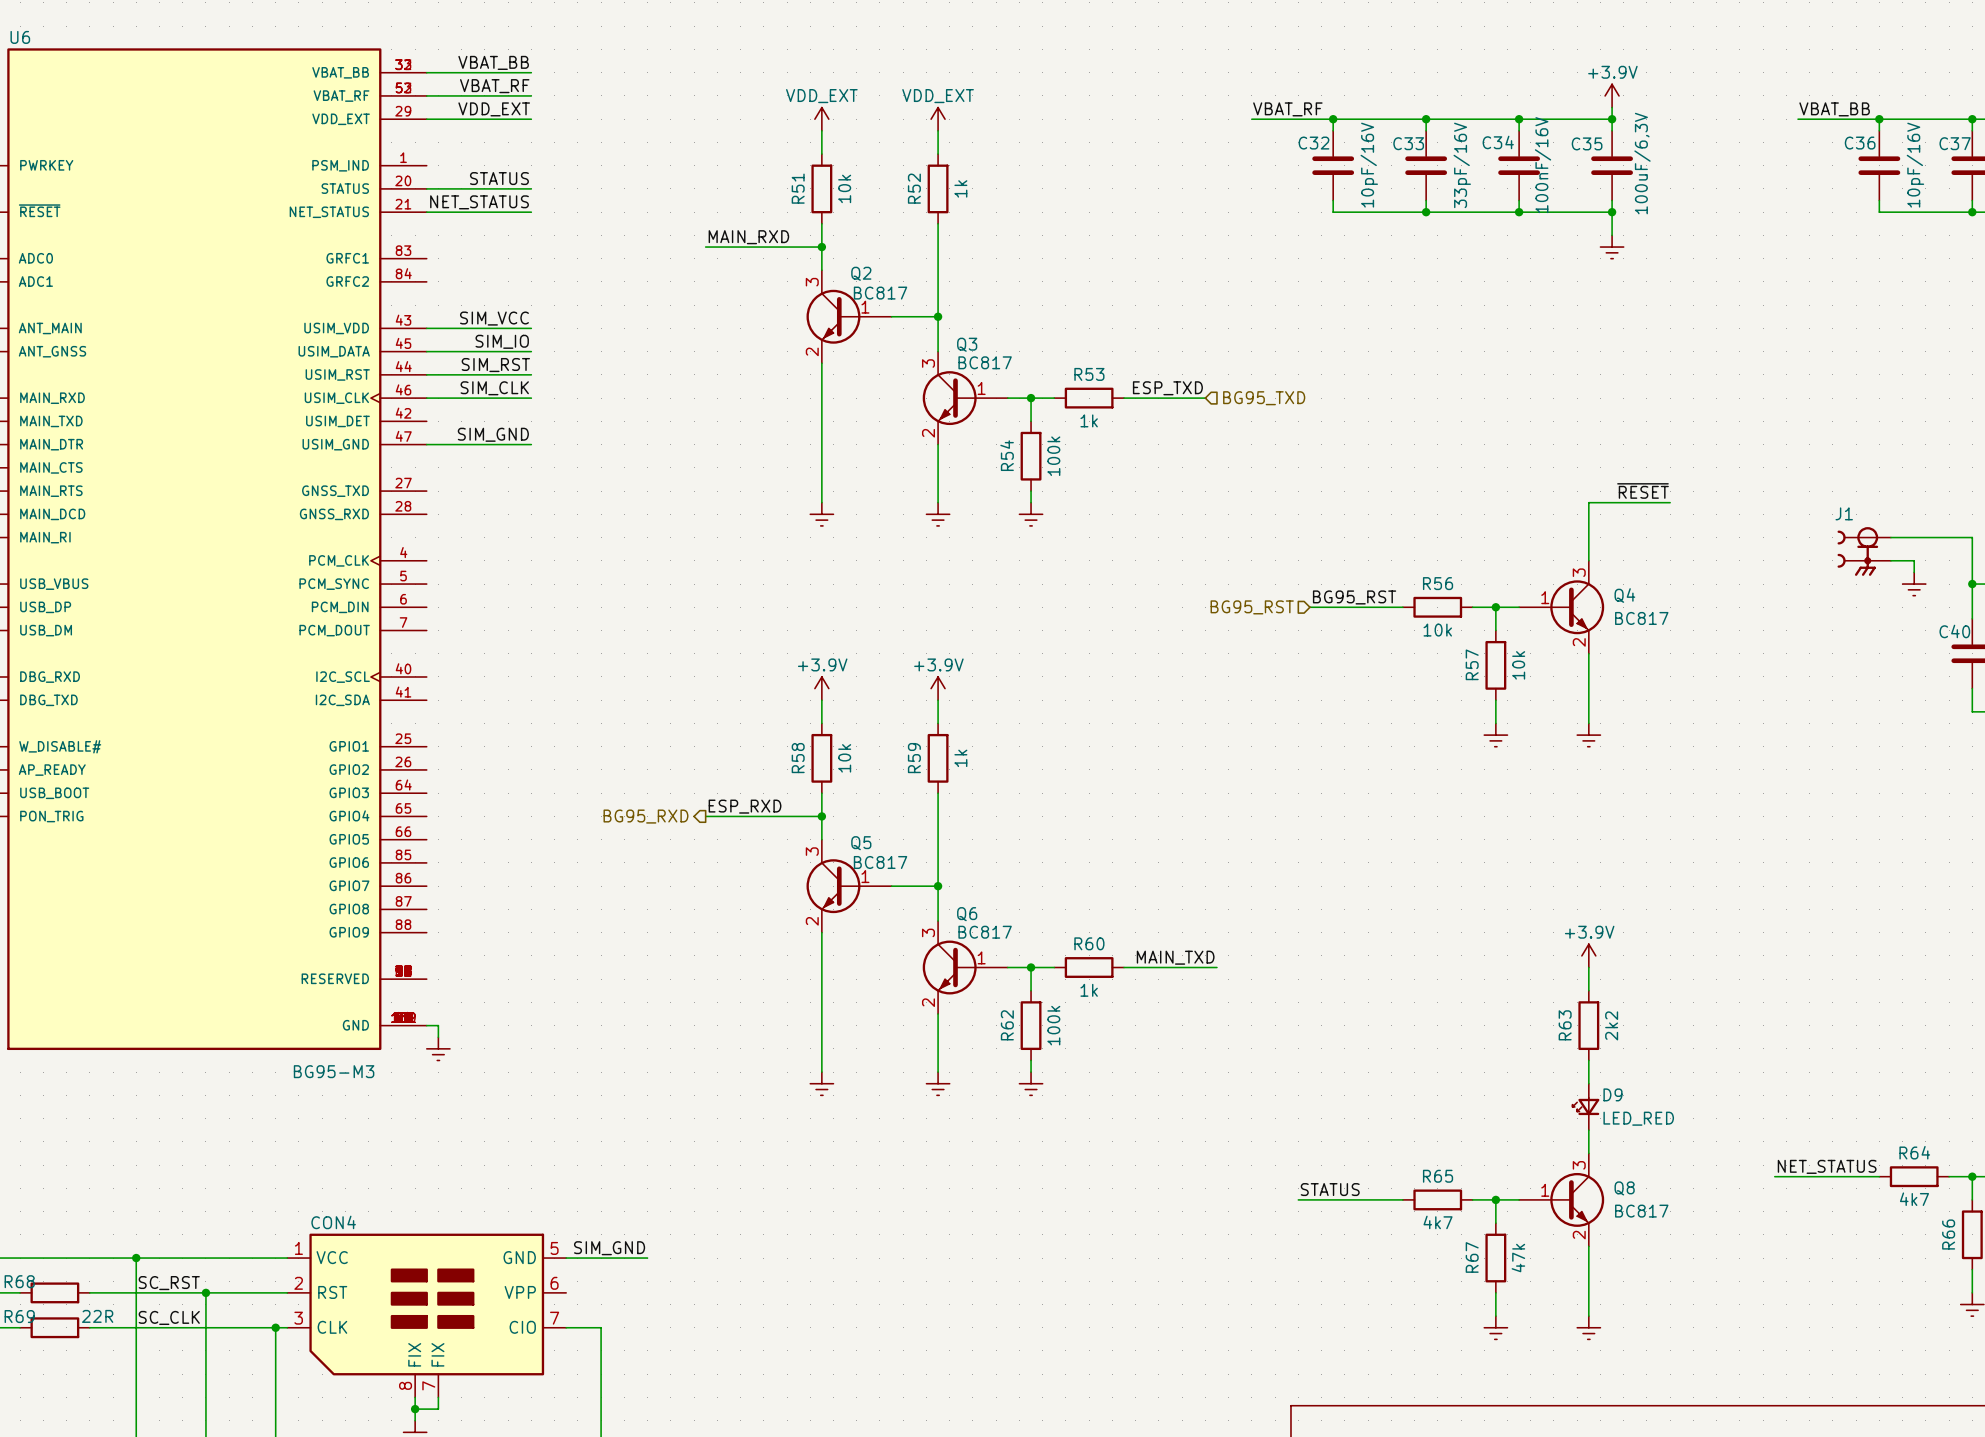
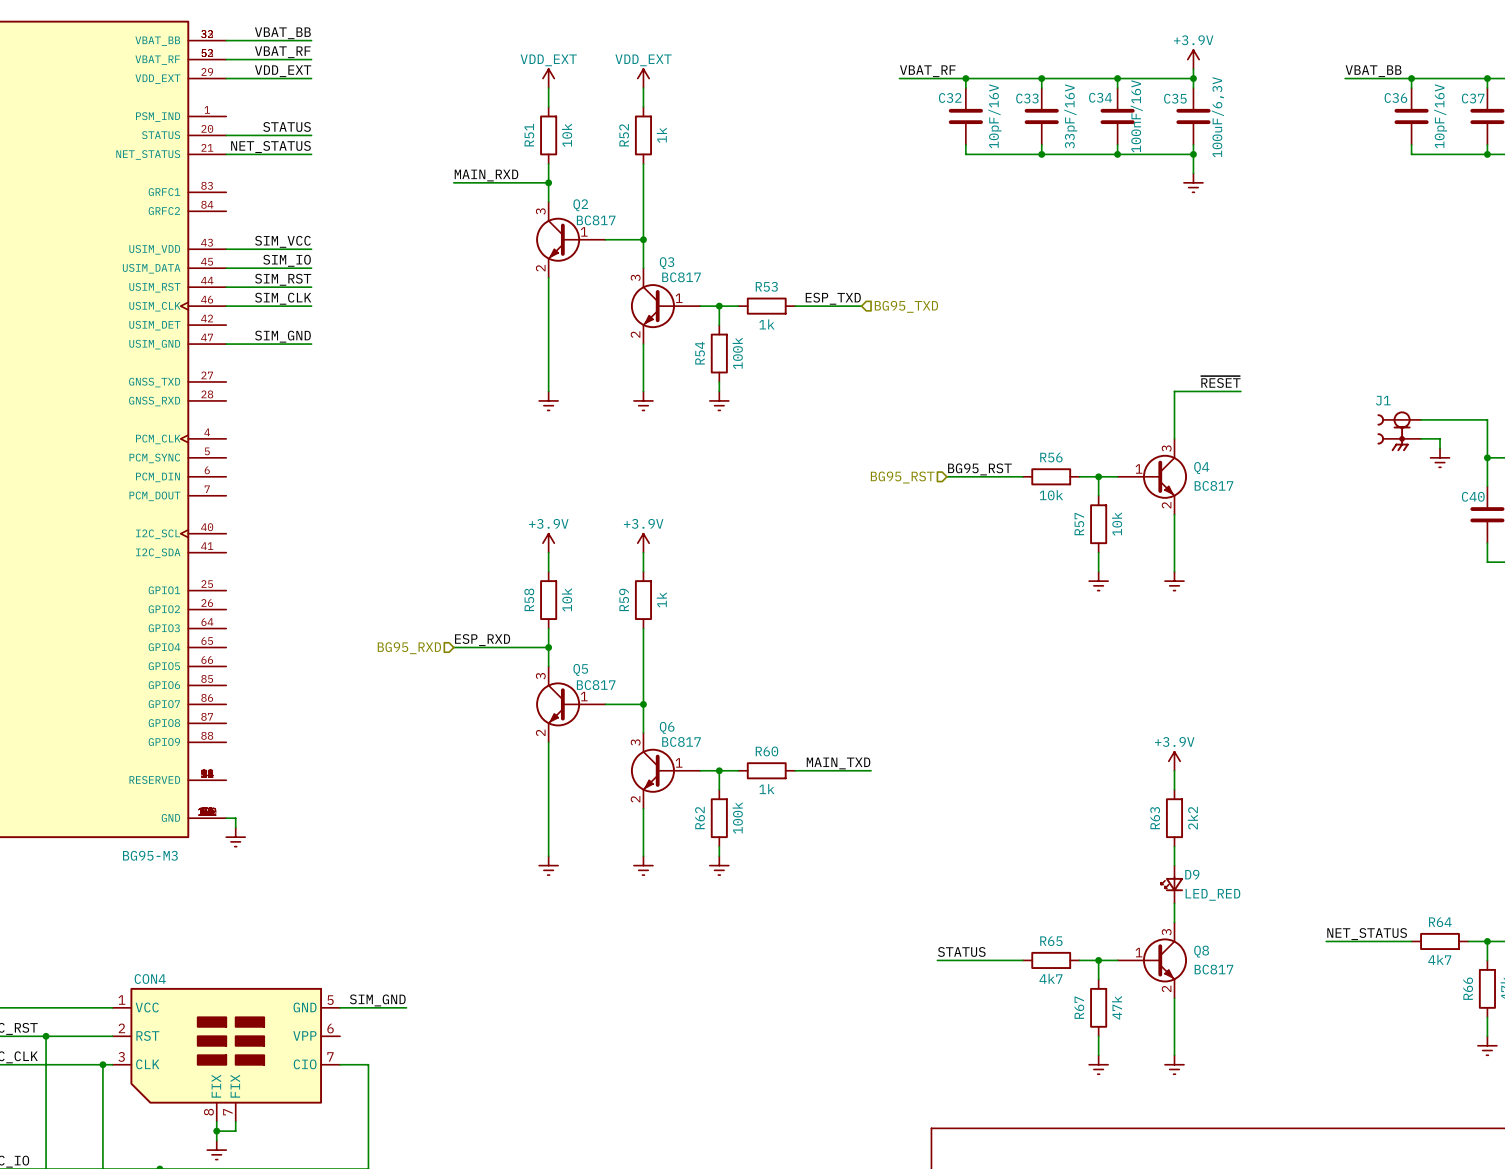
hierarchical label shape: output (645, 816) -> input (409, 648)

